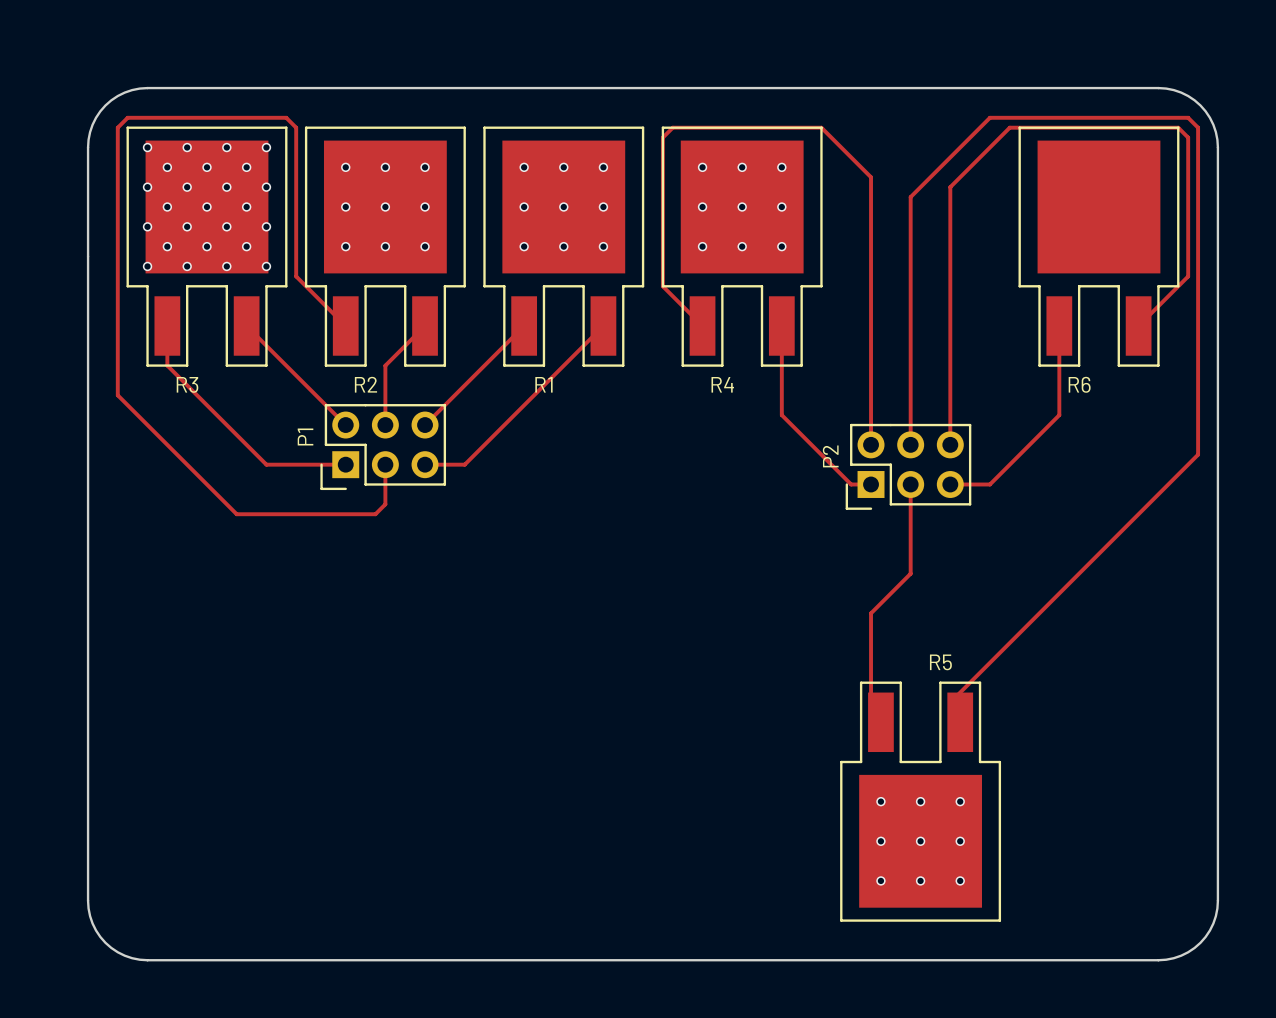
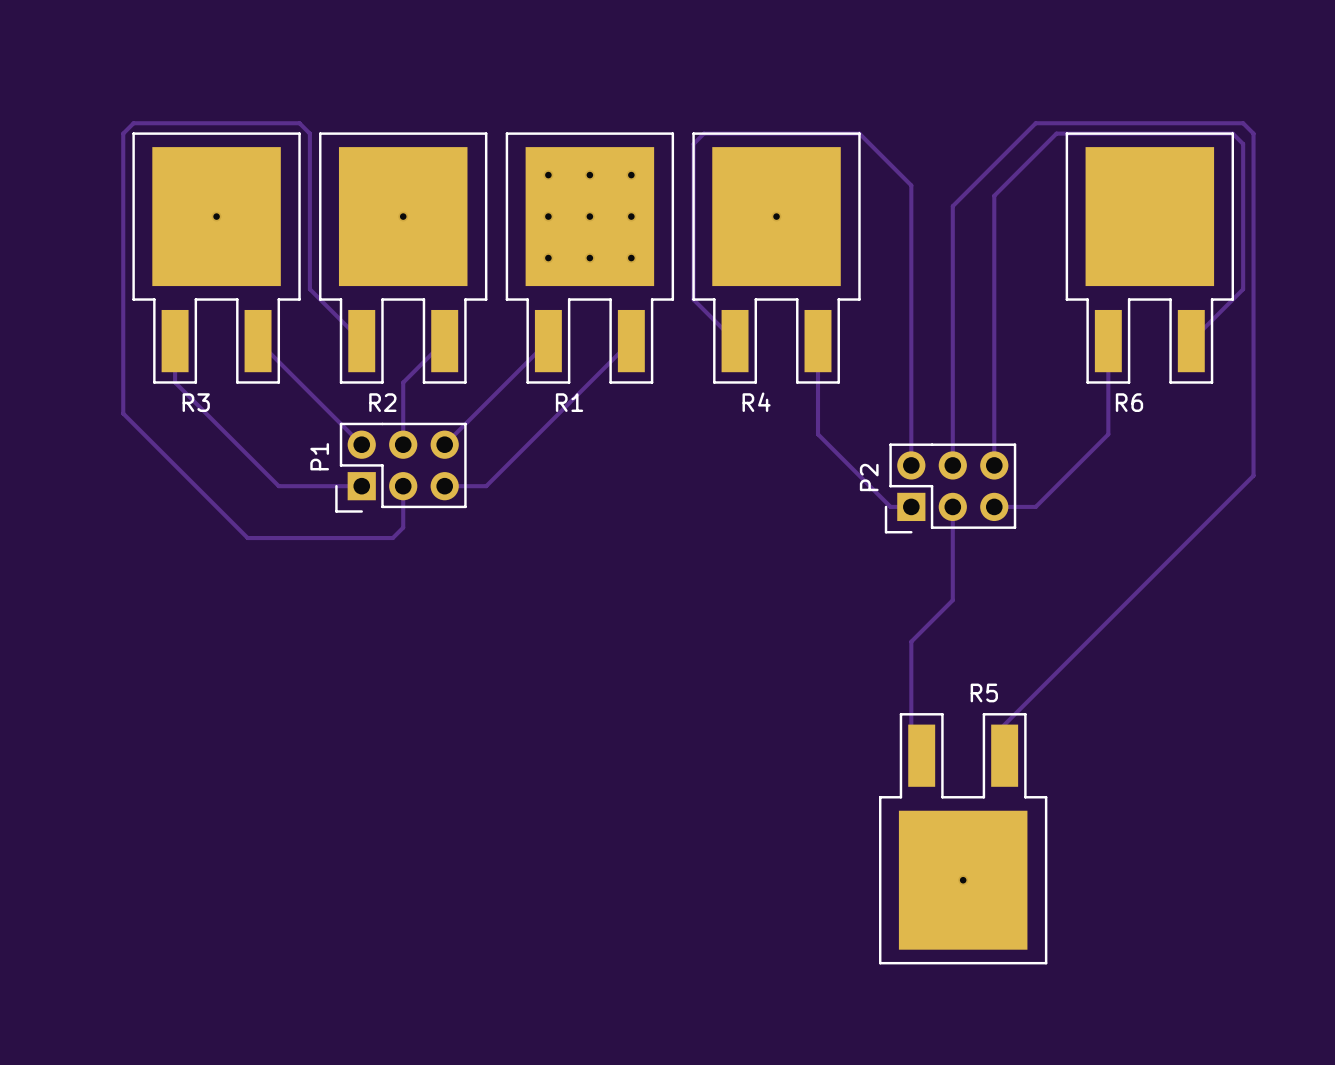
board edge: (147, 88) (1158, 88) (1181, 92) (1194, 100) (1209, 117) (1215, 132) (1217, 147) (1217, 900) (1215, 916) (1205, 936) (1188, 952) (1173, 958) (1158, 960) (147, 960) (132, 958) (111, 947) (96, 930) (90, 916) (88, 900) (88, 147) (92, 124) (105, 105) (124, 92) (147, 88) -> none
via: (147, 147) -> none
via: (187, 147) -> none
via: (226, 147) -> none
via: (266, 147) -> none
via: (167, 167) -> none
via: (206, 167) -> none
via: (246, 167) -> none
via: (345, 167) -> none
via: (385, 167) -> none
via: (425, 167) -> none
via: (702, 167) -> none
via: (742, 167) -> none
via: (781, 167) -> none
via: (147, 187) -> none
via: (187, 187) -> none
via: (226, 187) -> none
via: (266, 187) -> none
via: (167, 206) -> none
via: (246, 206) -> none
via: (345, 206) -> none
via: (425, 206) -> none
via: (702, 206) -> none
via: (781, 206) -> none
via: (147, 226) -> none
via: (187, 226) -> none
via: (226, 226) -> none
via: (266, 226) -> none
via: (167, 246) -> none
via: (206, 246) -> none
via: (246, 246) -> none
via: (345, 246) -> none
via: (385, 246) -> none
via: (425, 246) -> none
via: (702, 246) -> none
via: (742, 246) -> none
via: (781, 246) -> none
via: (147, 266) -> none
via: (187, 266) -> none
via: (226, 266) -> none
via: (266, 266) -> none
via: (880, 801) -> none
via: (920, 801) -> none
via: (960, 801) -> none
via: (880, 841) -> none
via: (960, 841) -> none
via: (880, 880) -> none
via: (920, 880) -> none
via: (960, 880) -> none

